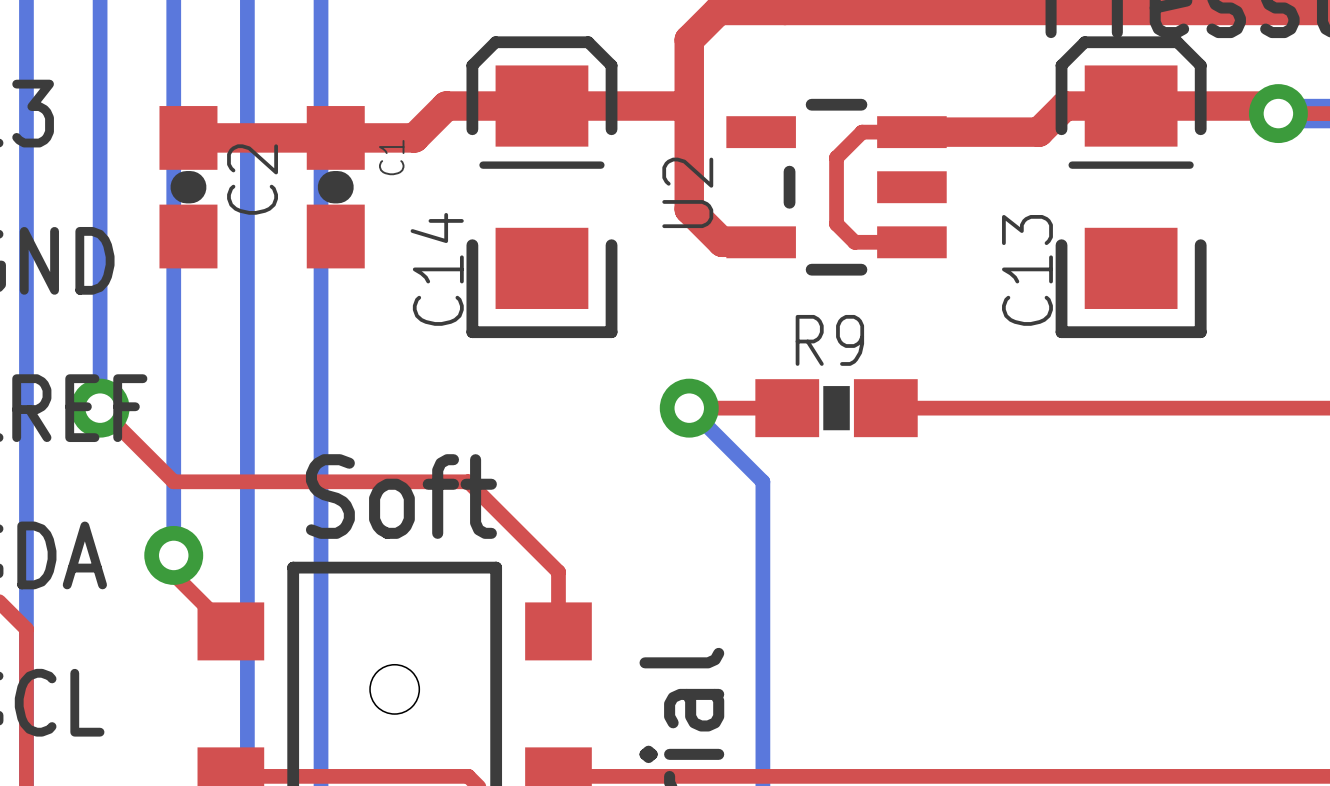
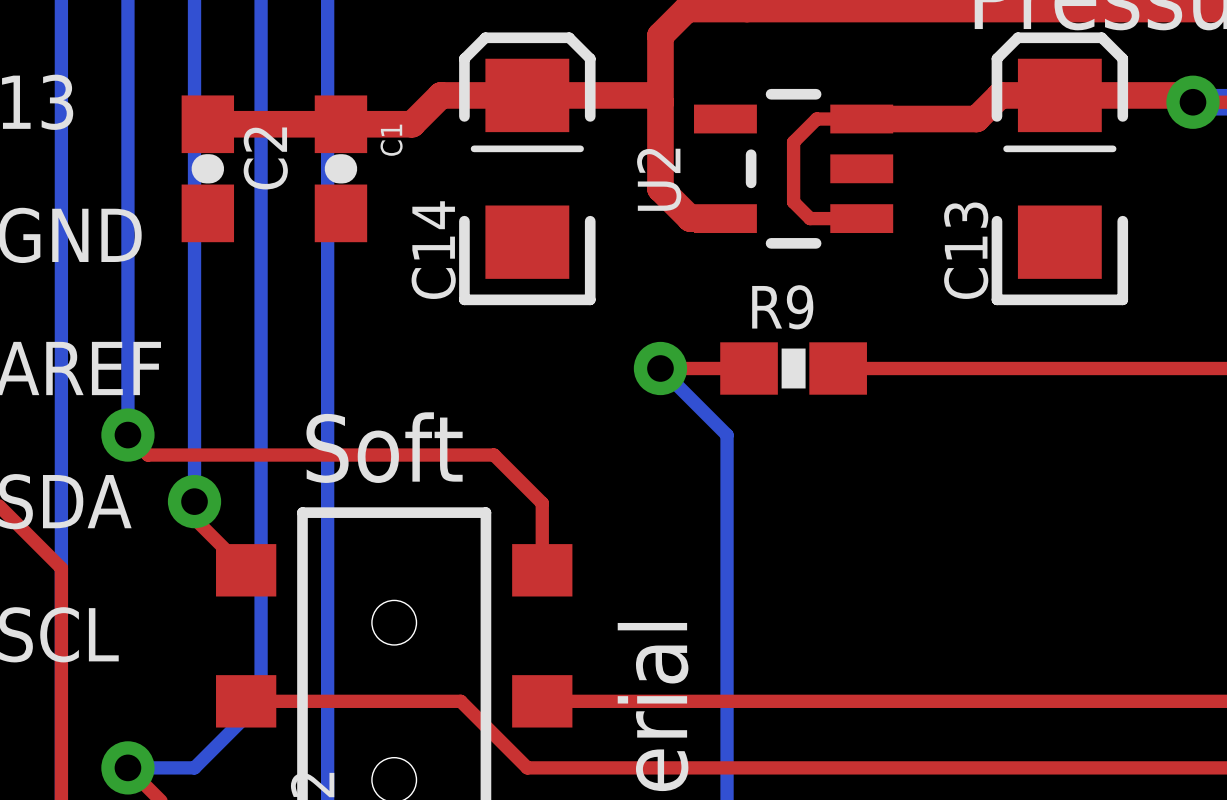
bottom track: none -> (127, 368) (127, 435)
top track: (100, 408) (173, 481) (468, 481) (558, 571) -> (127, 435) (147, 455) (494, 455) (542, 503) (542, 516)
via position: (100, 408) -> (127, 435)

